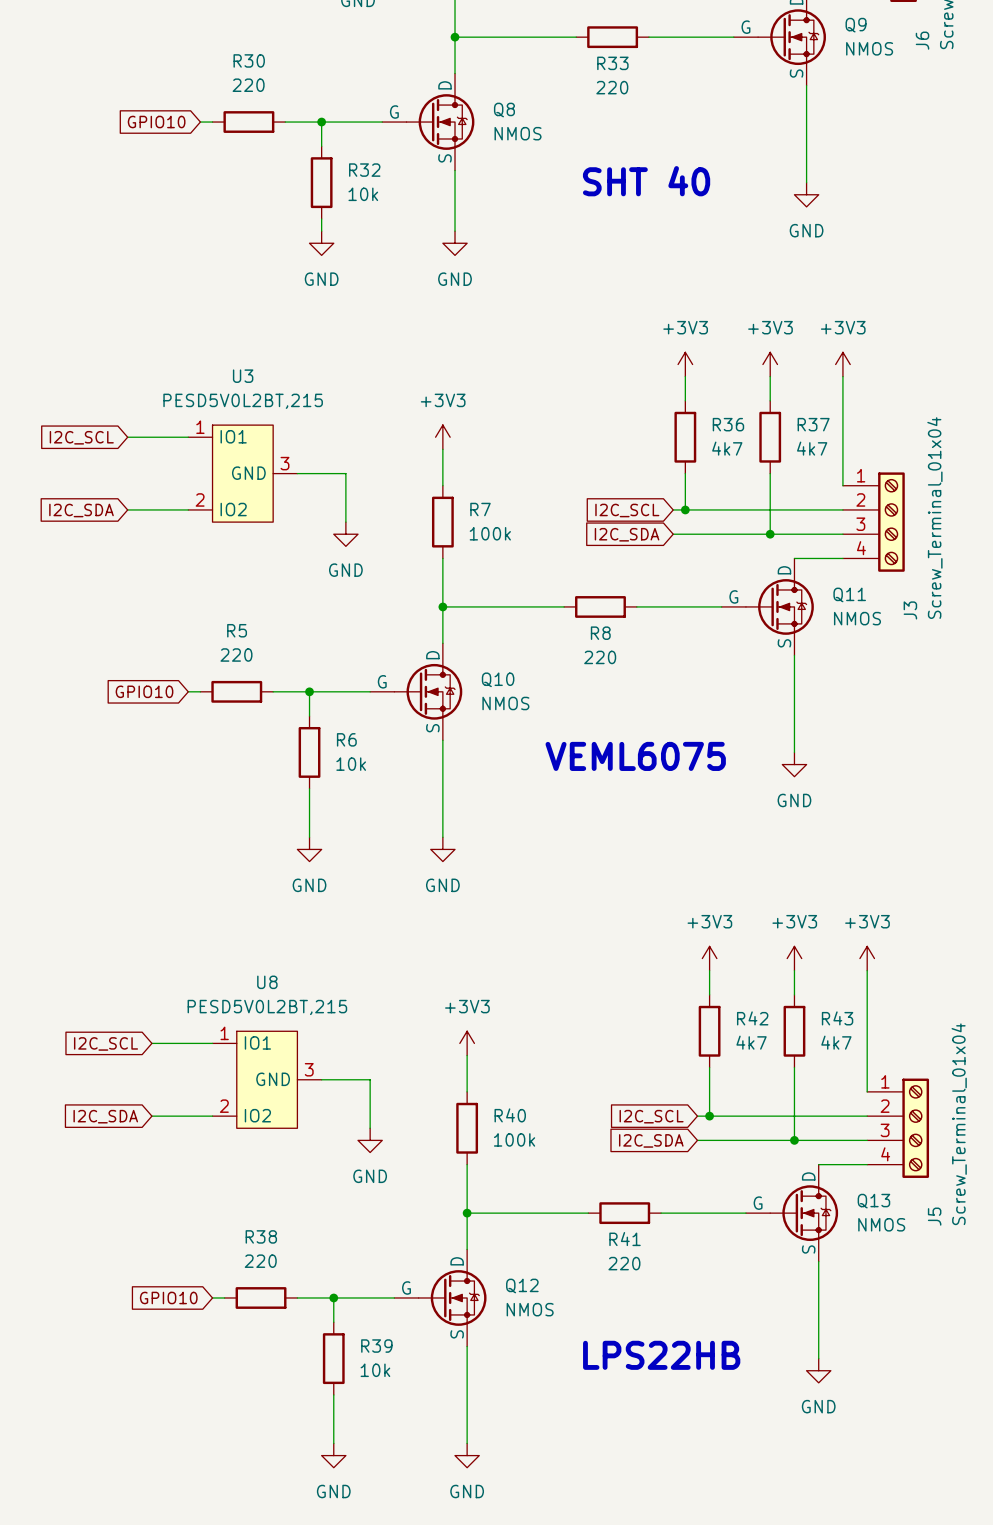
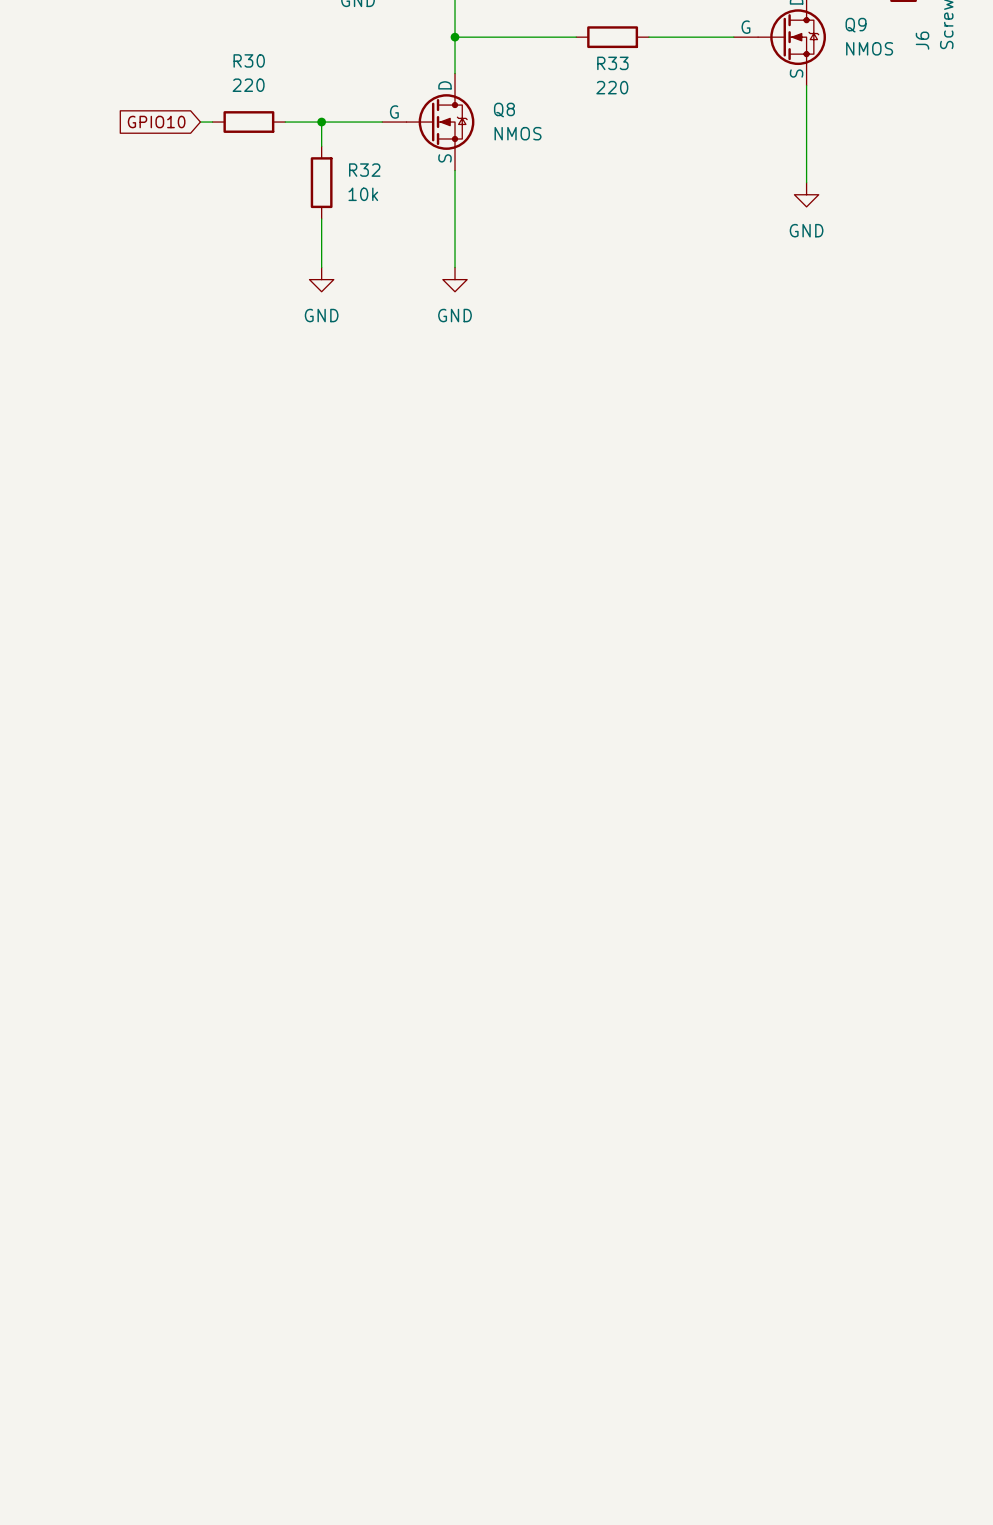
text: SHT 40 (646, 181) -> none
wire: none -> (321, 231) (321, 267)
power symbol position: GND (321, 243) -> GND (321, 279)
power symbol position: GND (455, 243) -> GND (455, 279)
power symbol: +3V3 (685, 364) -> none
power symbol: +3V3 (770, 364) -> none
power symbol: +3V3 (842, 364) -> none
wire: (685, 376) (685, 400) -> none
wire: (770, 376) (770, 400) -> none
wire: (842, 376) (842, 485) -> none
global label: I2C_SCL (81, 437) -> none
wire: (127, 437) (188, 437) -> none
power symbol: +3V3 (442, 437) -> none
R36: 4k7 (685, 437) -> none
R37: 4k7 (770, 437) -> none
wire: (442, 449) (442, 485) -> (455, 231) (455, 267)
U3: PESD5V0L2BT,215 (242, 473) -> none
wire: (297, 473) (345, 473) (345, 522) -> none
wire: (685, 473) (685, 509) -> none
wire: (770, 473) (770, 534) -> none
wire: (127, 509) (188, 509) -> none
wire: (673, 509) (842, 509) -> none
junction: (685, 509) -> none
global label: I2C_SDA (81, 510) -> none
global label: I2C_SCL (627, 510) -> none
R7: 100k (442, 522) -> none
J3: Screw_Terminal_01x04 (873, 522) -> none
power symbol: GND (345, 534) -> none
global label: I2C_SDA (627, 534) -> none
wire: (673, 534) (842, 534) -> none
junction: (770, 534) -> none
wire: (442, 558) (442, 643) -> none
wire: (794, 558) (842, 558) -> none
wire: (442, 606) (564, 606) -> none
junction: (442, 606) -> none
R8: 220 (600, 606) -> none
wire: (636, 606) (721, 606) -> none
Q11: NMOS (767, 606) -> none
wire: (794, 655) (794, 752) -> none
global label: GPIO10 (144, 691) -> none
wire: (188, 691) (200, 691) -> none
R5: 220 (236, 691) -> none
wire: (273, 691) (370, 691) -> none
wire: (309, 691) (309, 716) -> none
junction: (309, 691) -> none
Q10: NMOS (416, 691) -> none
wire: (442, 740) (442, 837) -> none
R6: 10k (309, 752) -> none
text: VEML6075 (635, 756) -> none
power symbol: GND (794, 764) -> none
wire: (309, 788) (309, 837) -> none
power symbol: GND (309, 849) -> none
power symbol: GND (442, 849) -> none
power symbol: +3V3 (709, 958) -> none
power symbol: +3V3 (794, 958) -> none
power symbol: +3V3 (867, 958) -> none
wire: (709, 970) (709, 994) -> none
wire: (794, 970) (794, 994) -> none
wire: (867, 970) (867, 1091) -> none
R42: 4k7 (709, 1031) -> none
R43: 4k7 (794, 1031) -> none
global label: I2C_SCL (106, 1043) -> none
wire: (151, 1043) (212, 1043) -> none
power symbol: +3V3 (467, 1043) -> none
wire: (467, 1055) (467, 1091) -> none
wire: (709, 1067) (709, 1116) -> none
wire: (794, 1067) (794, 1140) -> none
U8: PESD5V0L2BT,215 (267, 1079) -> none
wire: (321, 1079) (370, 1079) (370, 1128) -> none
global label: I2C_SDA (105, 1116) -> none
wire: (151, 1116) (212, 1116) -> none
global label: I2C_SCL (651, 1116) -> none
wire: (697, 1116) (867, 1116) -> none
junction: (709, 1116) -> none
R40: 100k (467, 1128) -> none
J5: Screw_Terminal_01x04 (898, 1128) -> none
power symbol: GND (370, 1140) -> none
global label: I2C_SDA (651, 1140) -> none
wire: (697, 1140) (867, 1140) -> none
junction: (794, 1140) -> none
wire: (467, 1164) (467, 1249) -> none
wire: (818, 1164) (867, 1164) -> none
wire: (467, 1213) (588, 1213) -> none
junction: (467, 1213) -> none
R41: 220 (624, 1213) -> none
wire: (661, 1213) (745, 1213) -> none
Q13: NMOS (792, 1213) -> none
wire: (818, 1261) (818, 1358) -> none
global label: GPIO10 (168, 1297) -> none
wire: (212, 1297) (224, 1297) -> none
R38: 220 (261, 1297) -> none
wire: (297, 1297) (394, 1297) -> none
wire: (333, 1297) (333, 1322) -> none
junction: (333, 1297) -> none
Q12: NMOS (440, 1297) -> none
wire: (467, 1346) (467, 1443) -> none
text: LPS22HB (661, 1355) -> none
R39: 10k (333, 1358) -> none
power symbol: GND (818, 1370) -> none
wire: (333, 1394) (333, 1443) -> none
power symbol: GND (333, 1455) -> none
power symbol: GND (467, 1455) -> none

